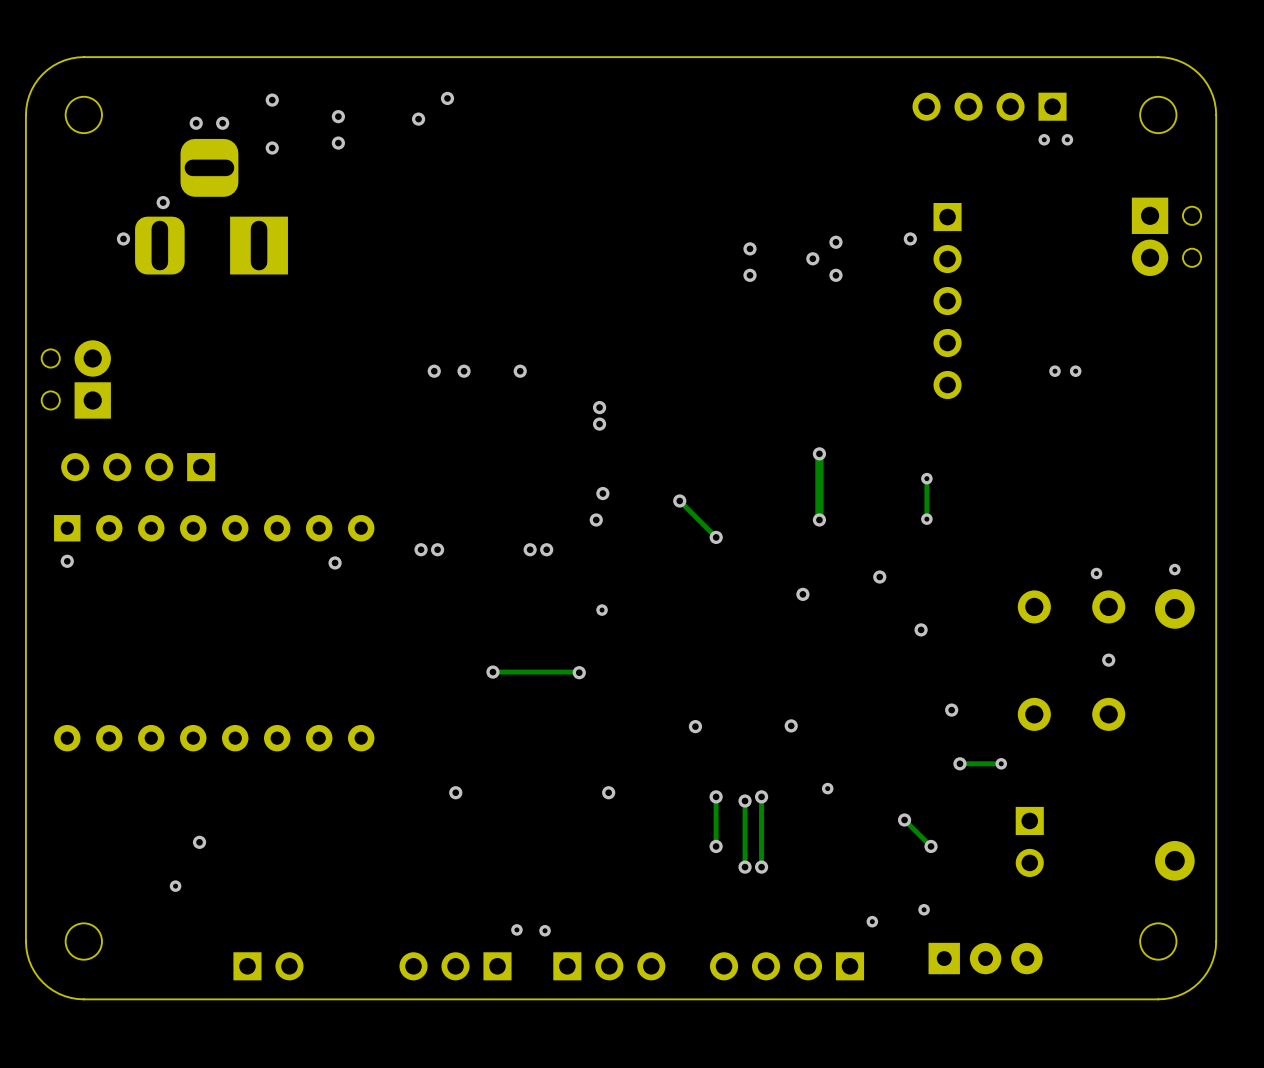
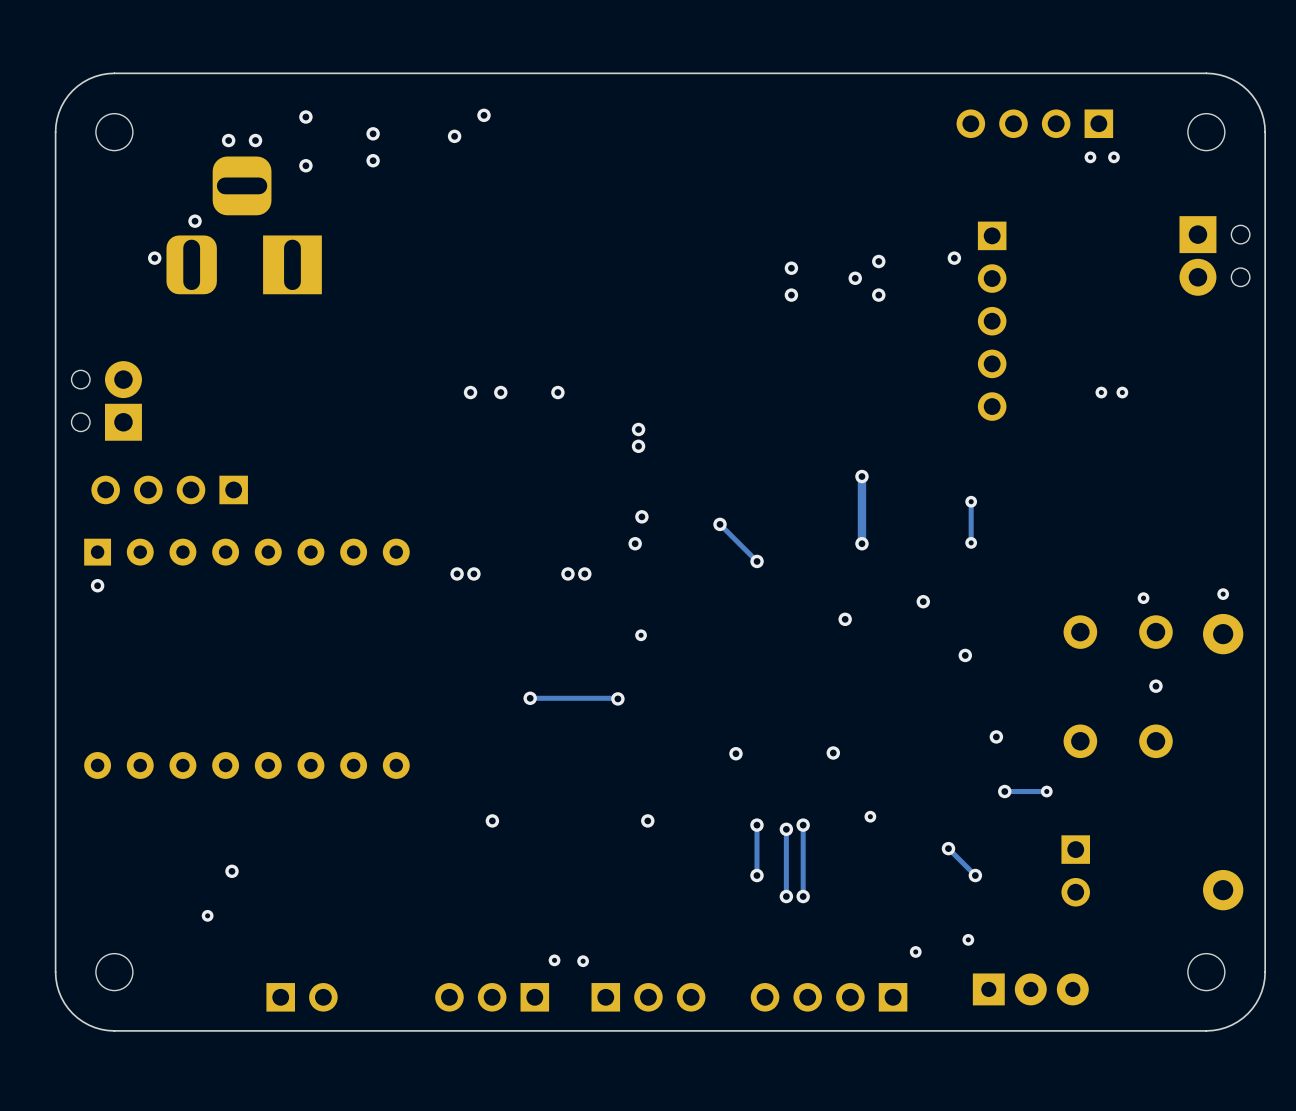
via: (335, 562) -> none

